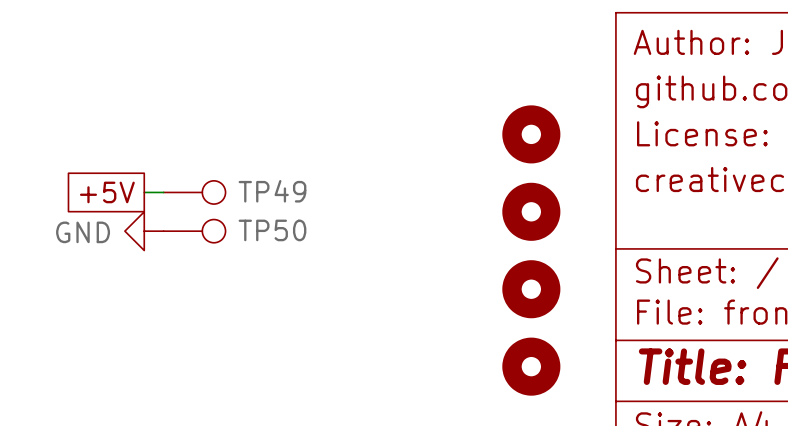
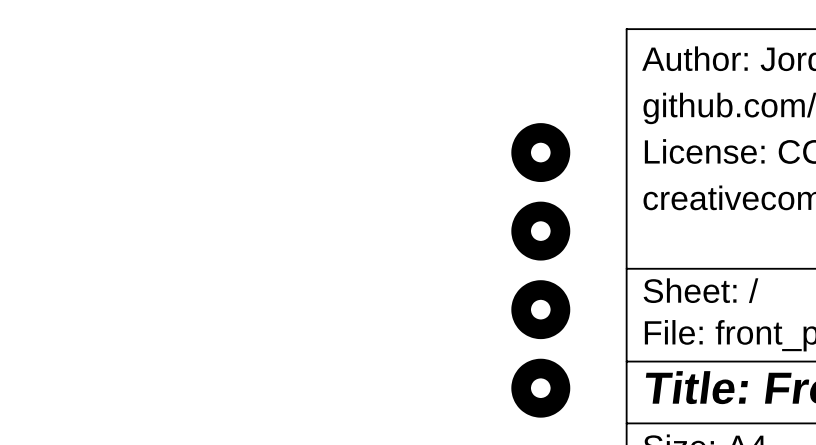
global label: +5V (107, 192) -> none
wire: (144, 192) (163, 192) -> none
TP49: (194, 192) -> none
power symbol: GND (144, 231) -> none
TP50: (194, 231) -> none

